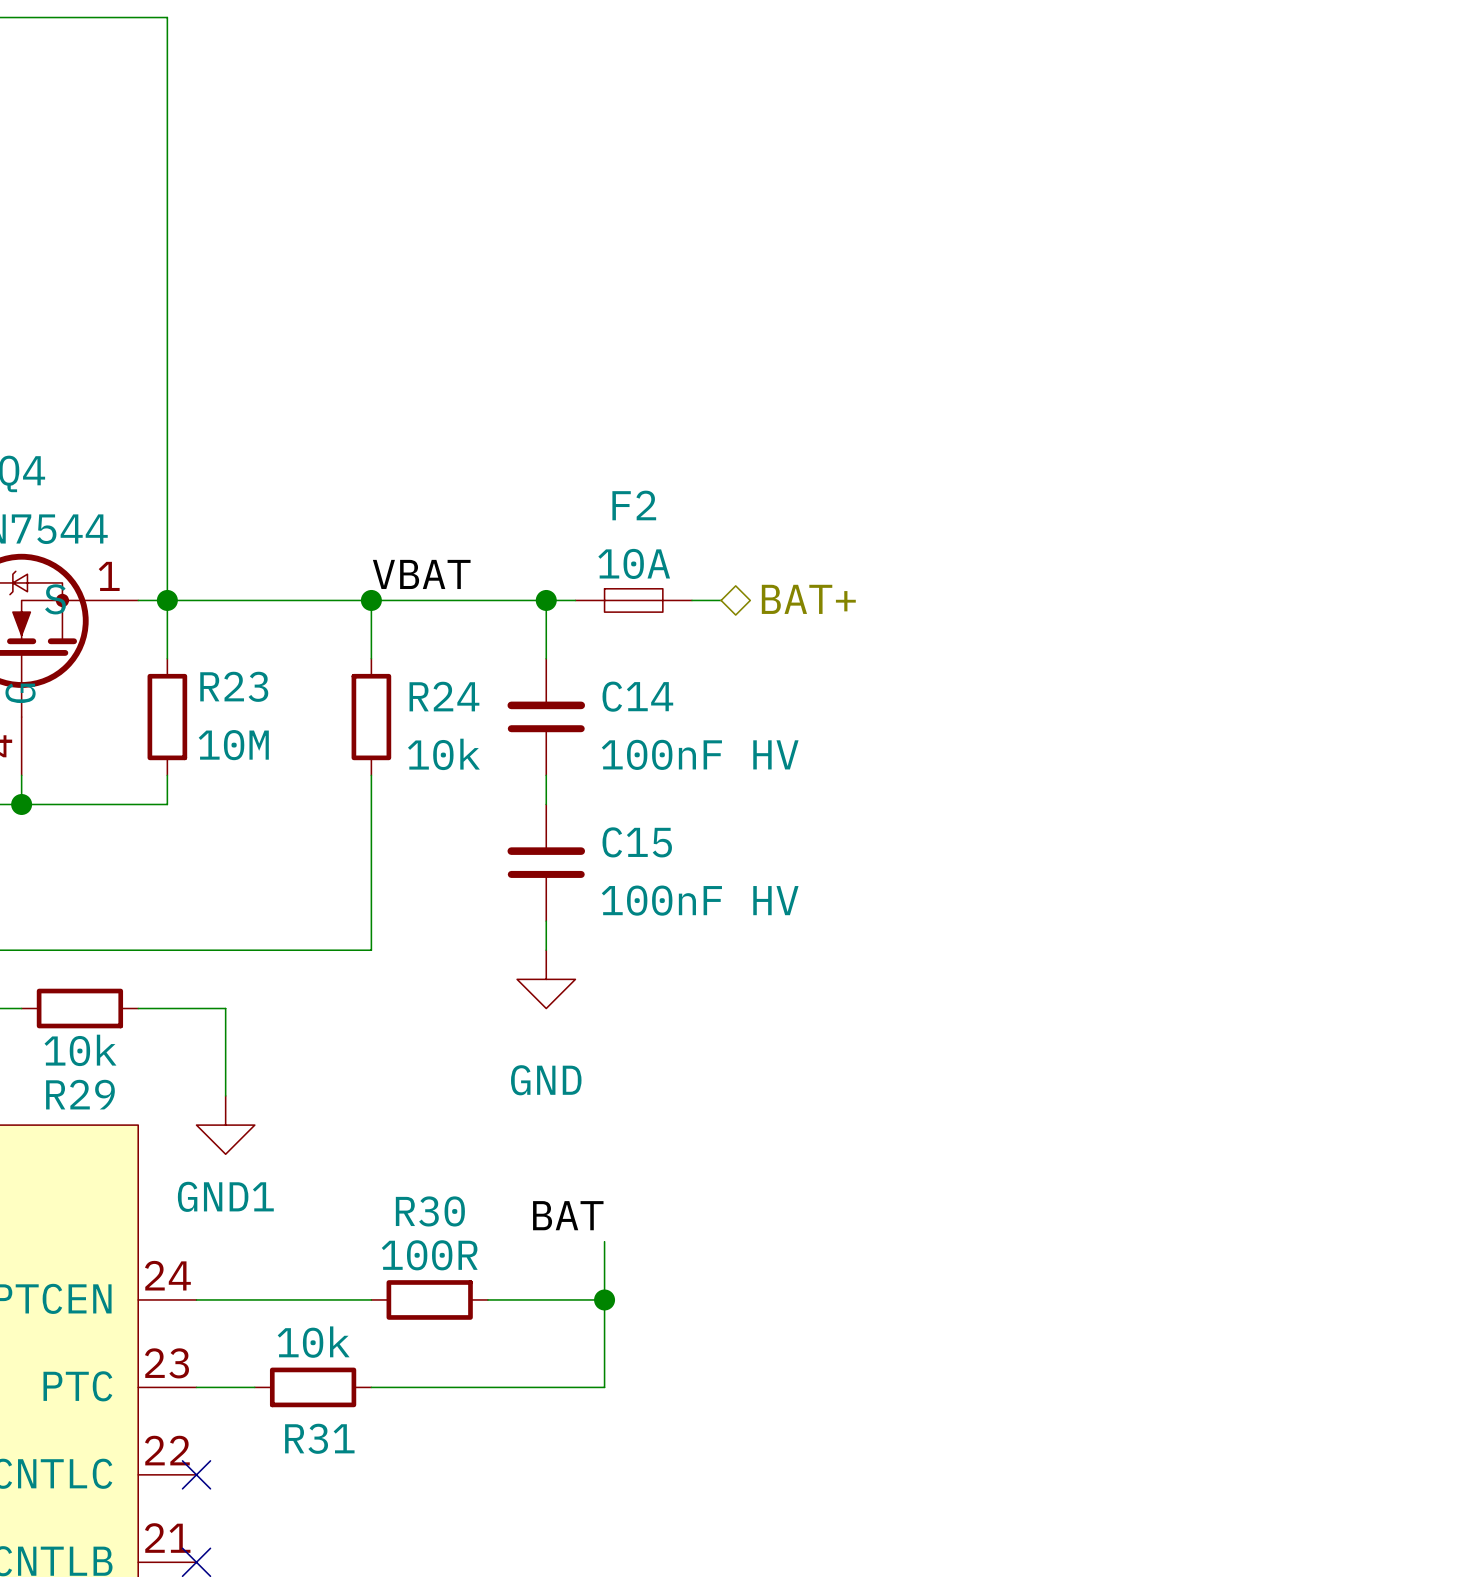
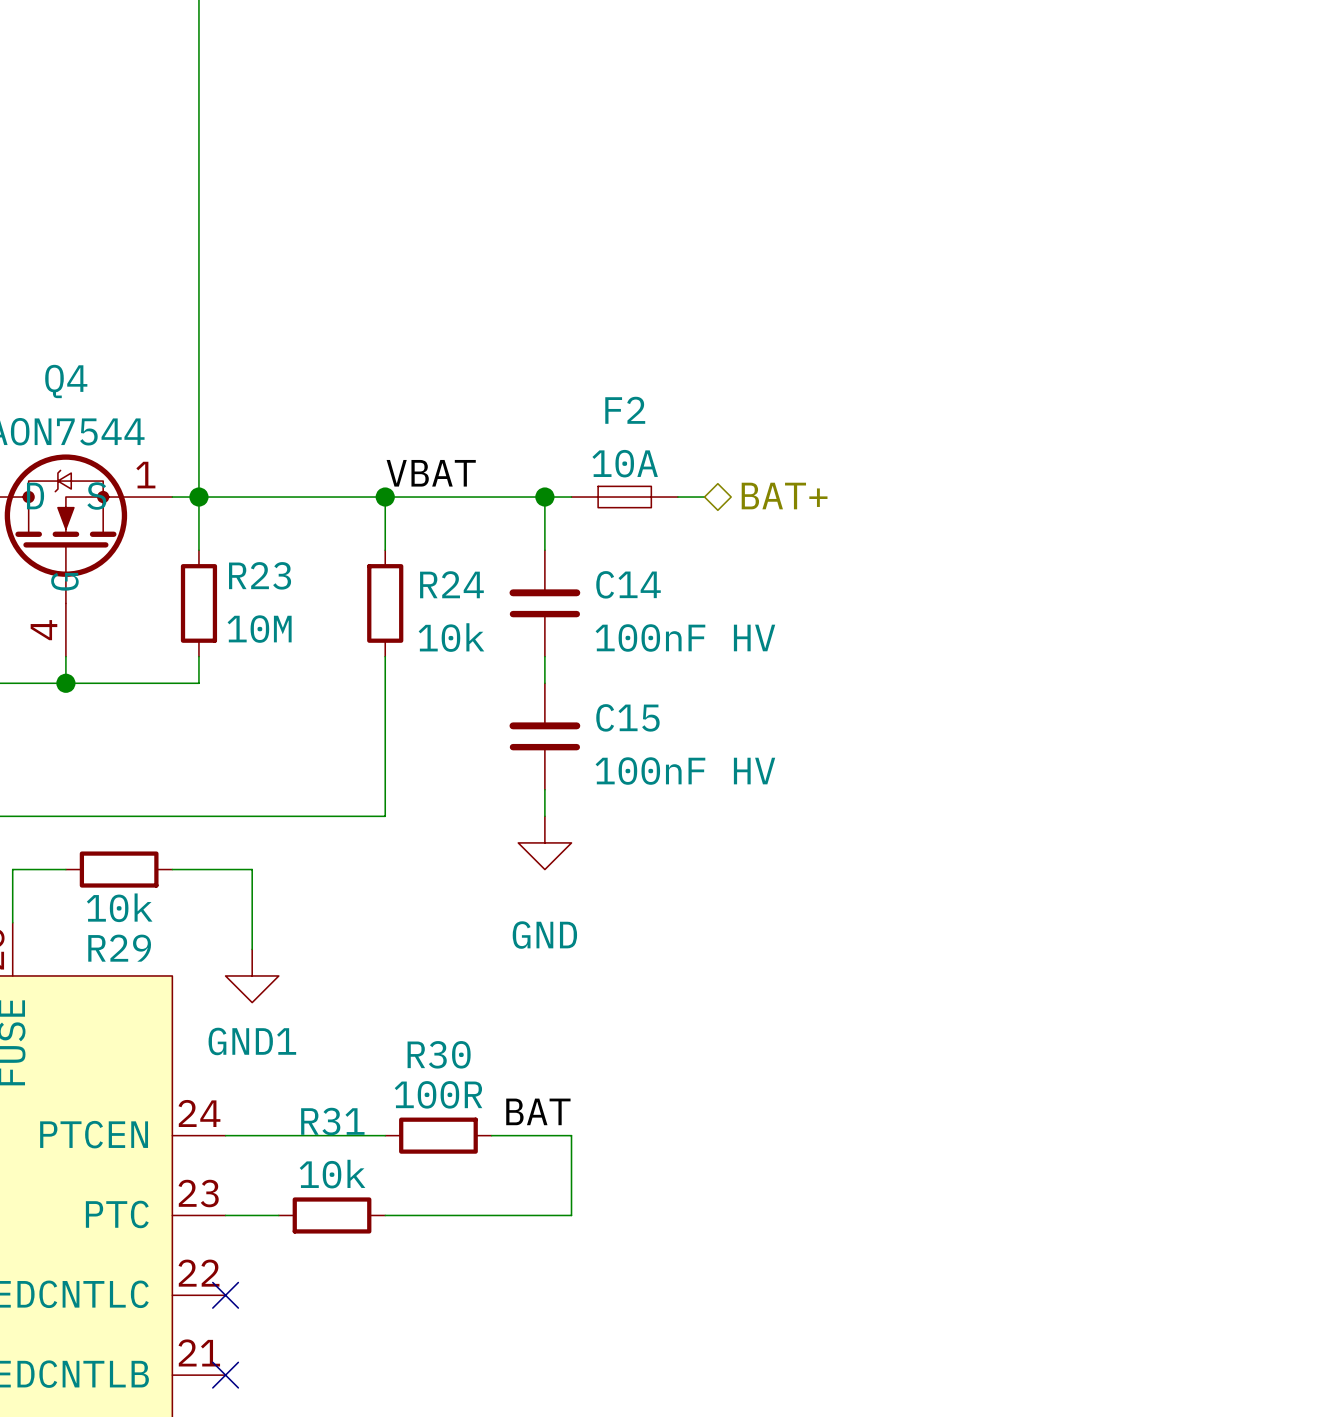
label position: BAT (568, 1215) -> BAT (538, 1111)
wire: (604, 1241) (604, 1387) (575, 1387) -> (571, 1135) (571, 1215)
wire: (575, 1299) (604, 1299) -> none
junction: (604, 1299) -> none
R31 name position: R31 (319, 1438) -> R31 (332, 1121)

